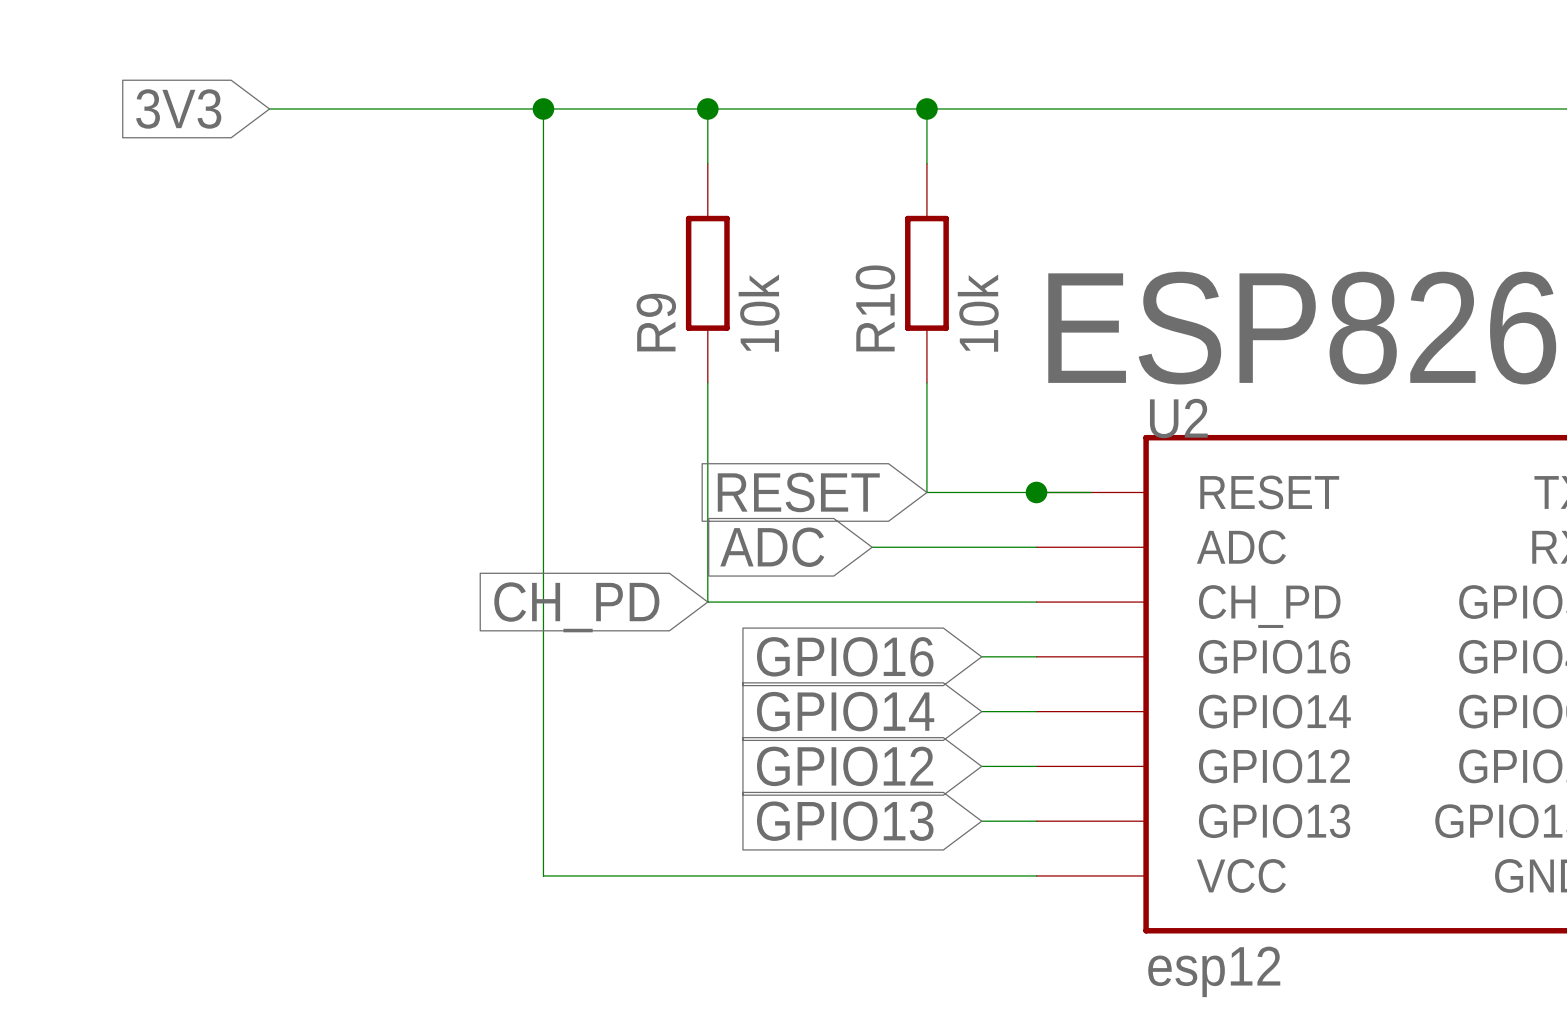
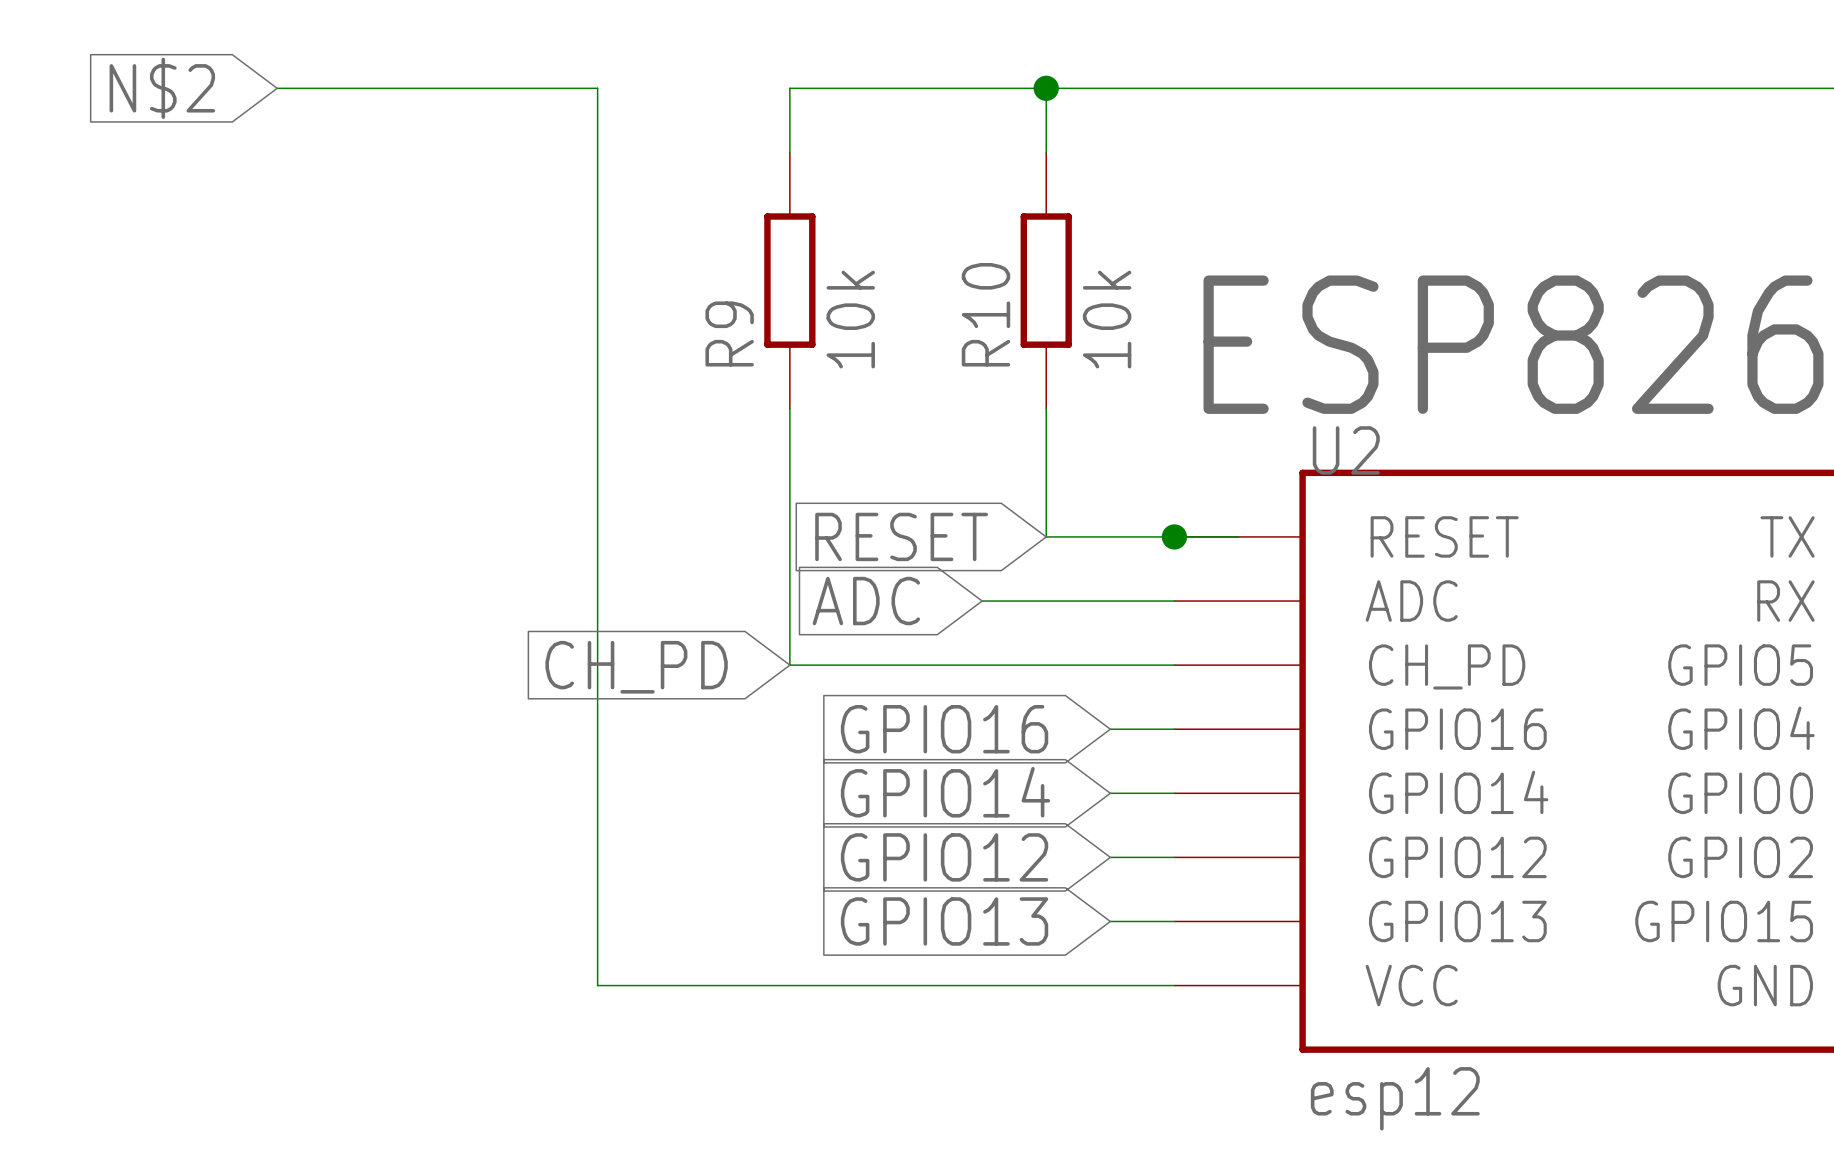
global label: 3V3 (178, 108) -> N$2 (162, 88)
wire: (543, 108) (707, 108) -> none
junction: (543, 108) -> none
junction: (707, 108) -> none

